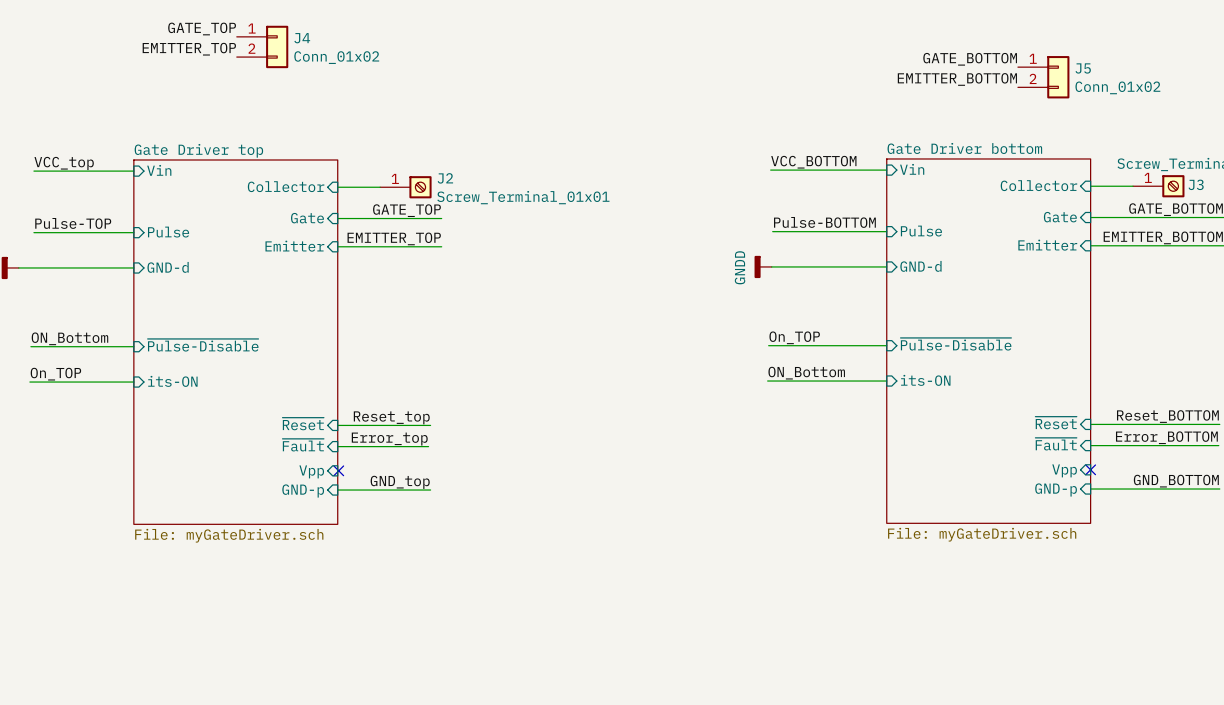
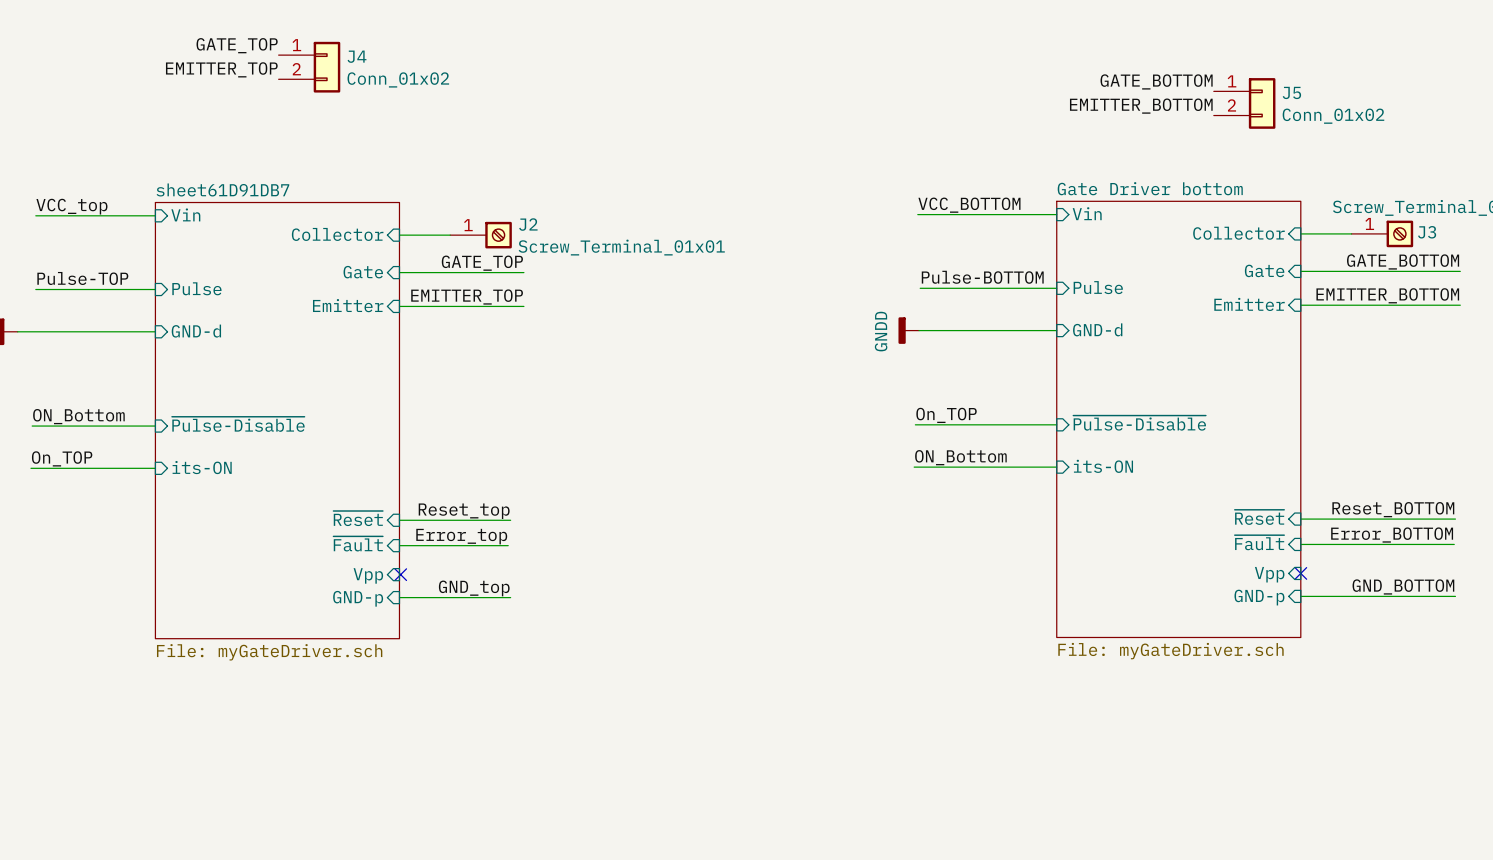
sheet Gate Driver top name: Gate Driver top (198, 150) -> sheet61D91DB7 (222, 189)

